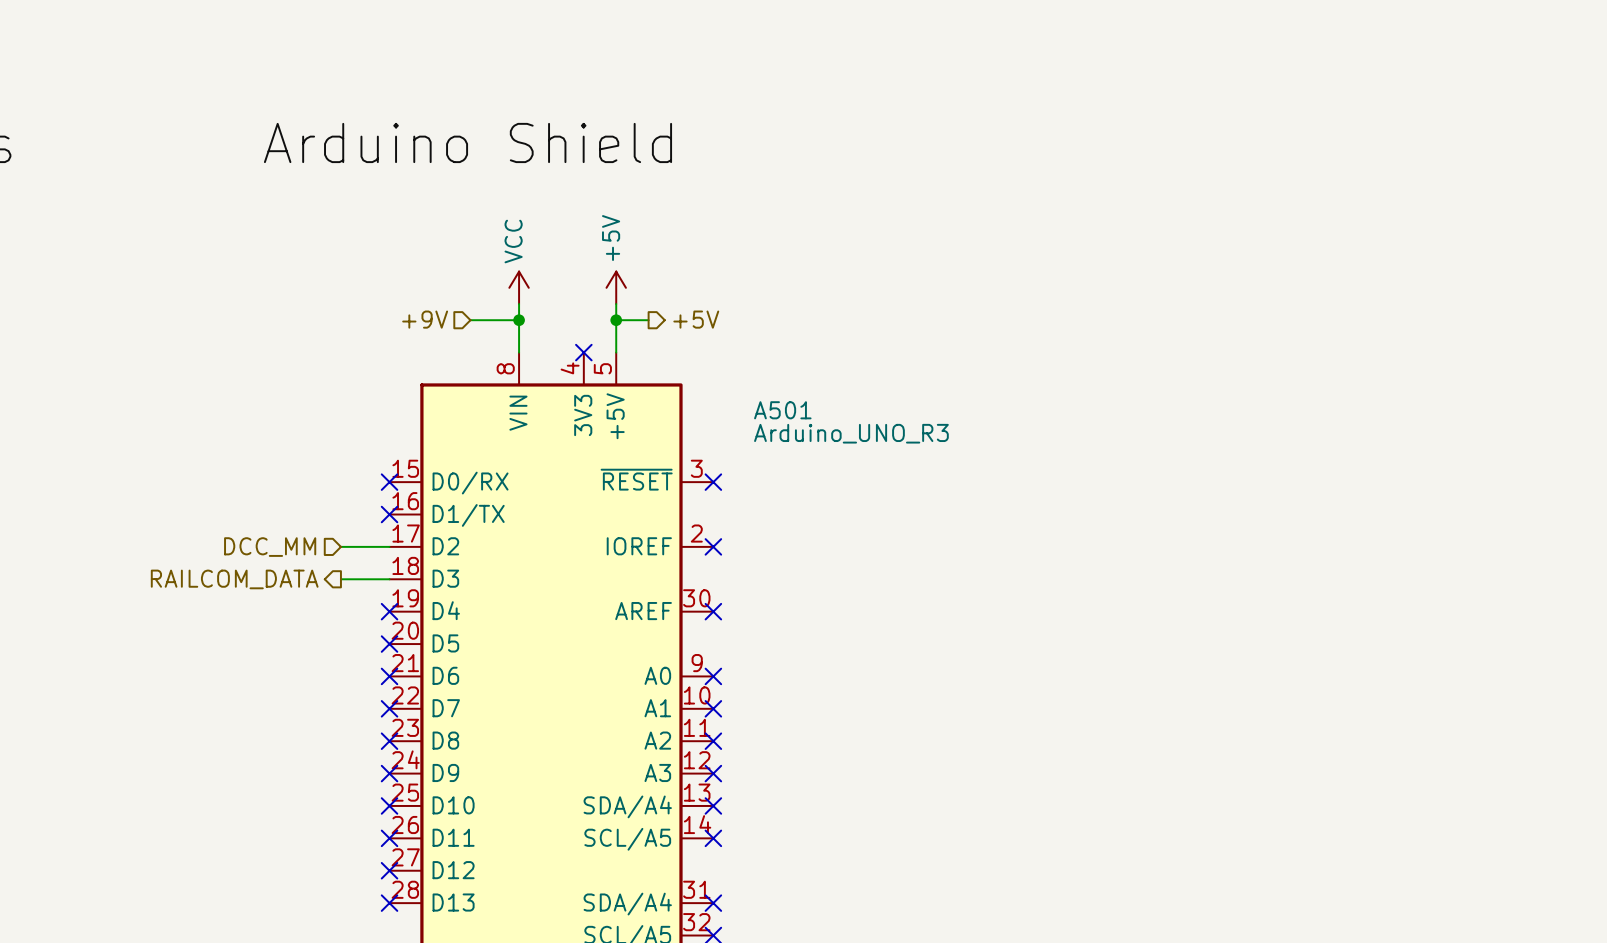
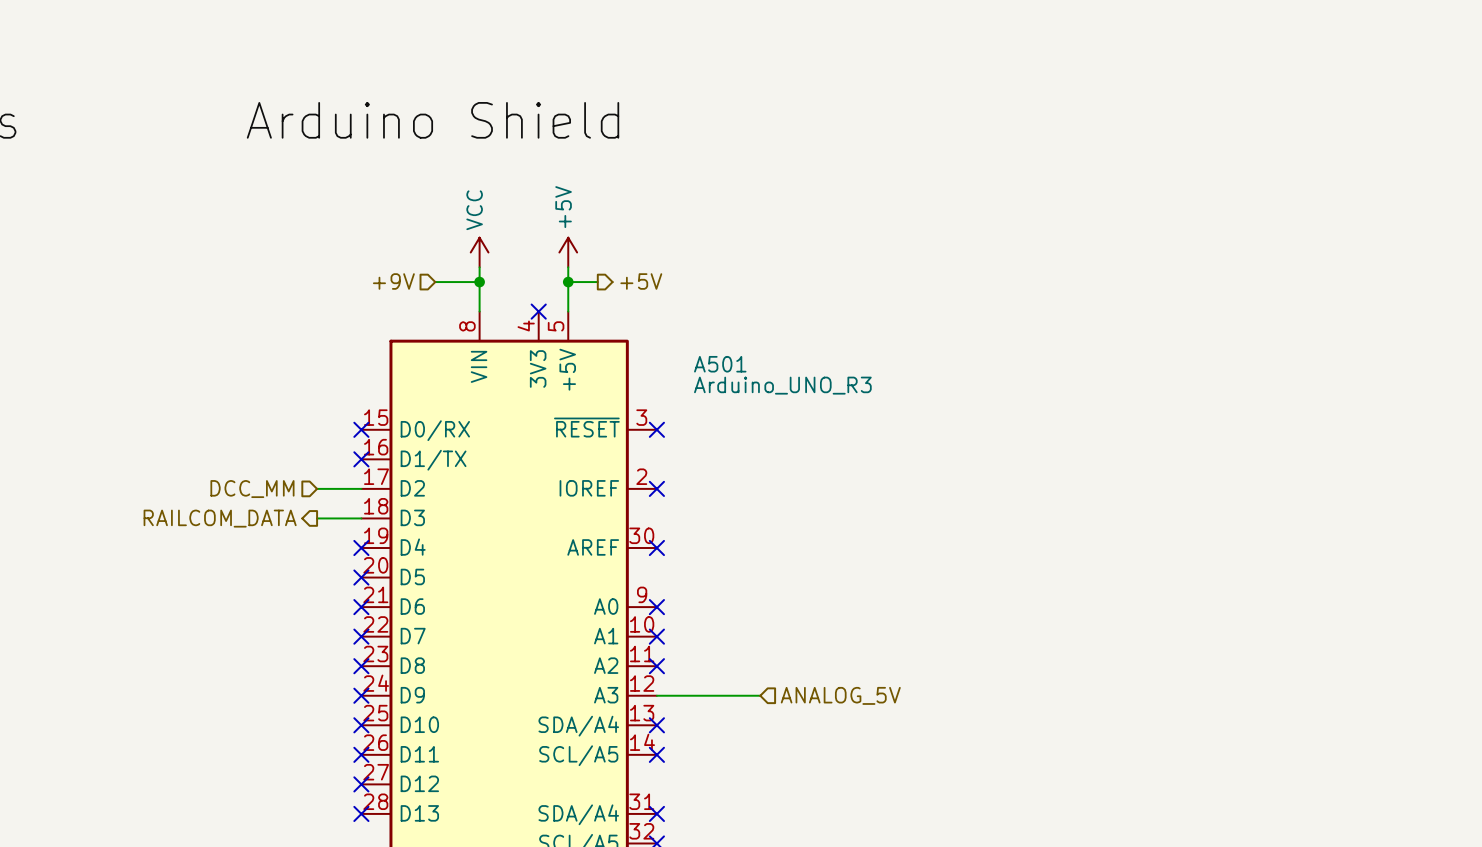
wire: none -> (656, 695) (760, 695)
no-connect mark: (713, 773) -> none
hierarchical label: none -> ANALOG_5V (840, 695)

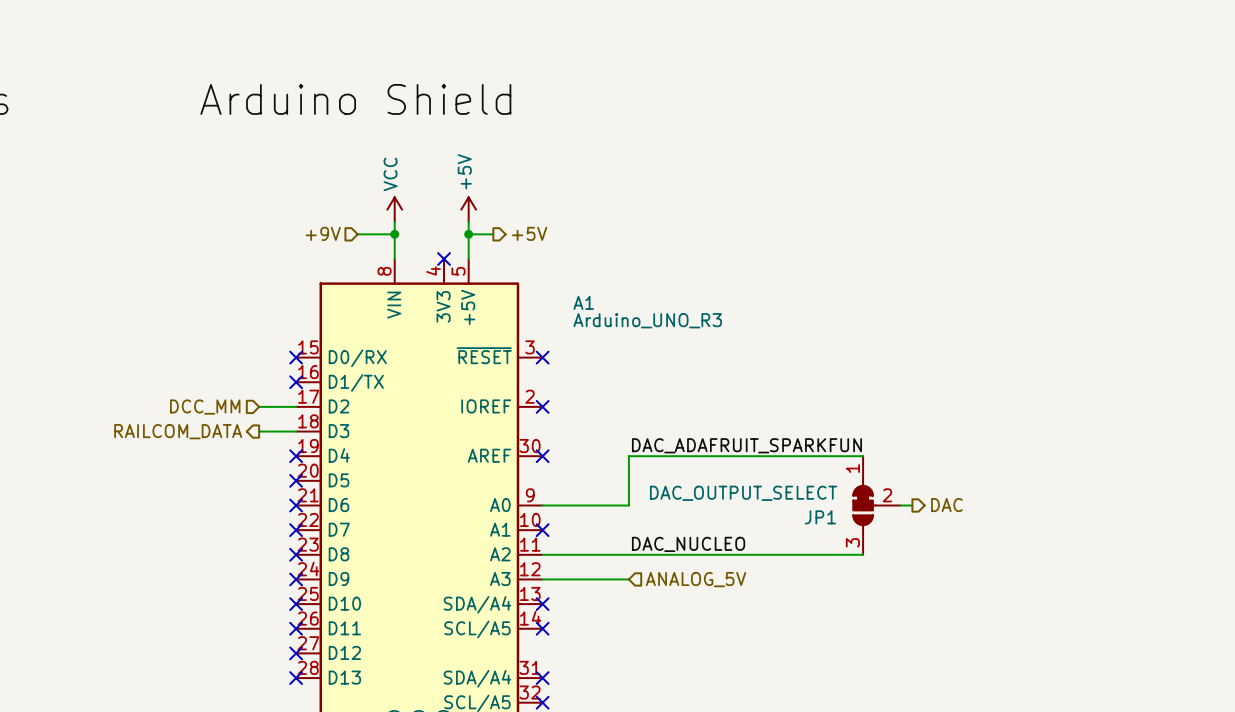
A501 name: A501 (720, 364) -> A1 (583, 302)
label: none -> DAC_ADAFRUIT_SPARKFUN (746, 445)
wire: none -> (863, 456) (628, 456) (628, 505) (542, 505)
hierarchical label: none -> DAC (946, 505)
no-connect mark: (656, 607) -> none
JP1: none -> DAC_OUTPUT_SELECT (876, 505)
wire: none -> (900, 505) (912, 505)
label: none -> DAC_NUCLEO (688, 544)
wire: none -> (542, 554) (863, 554)
no-connect mark: (656, 666) -> none

